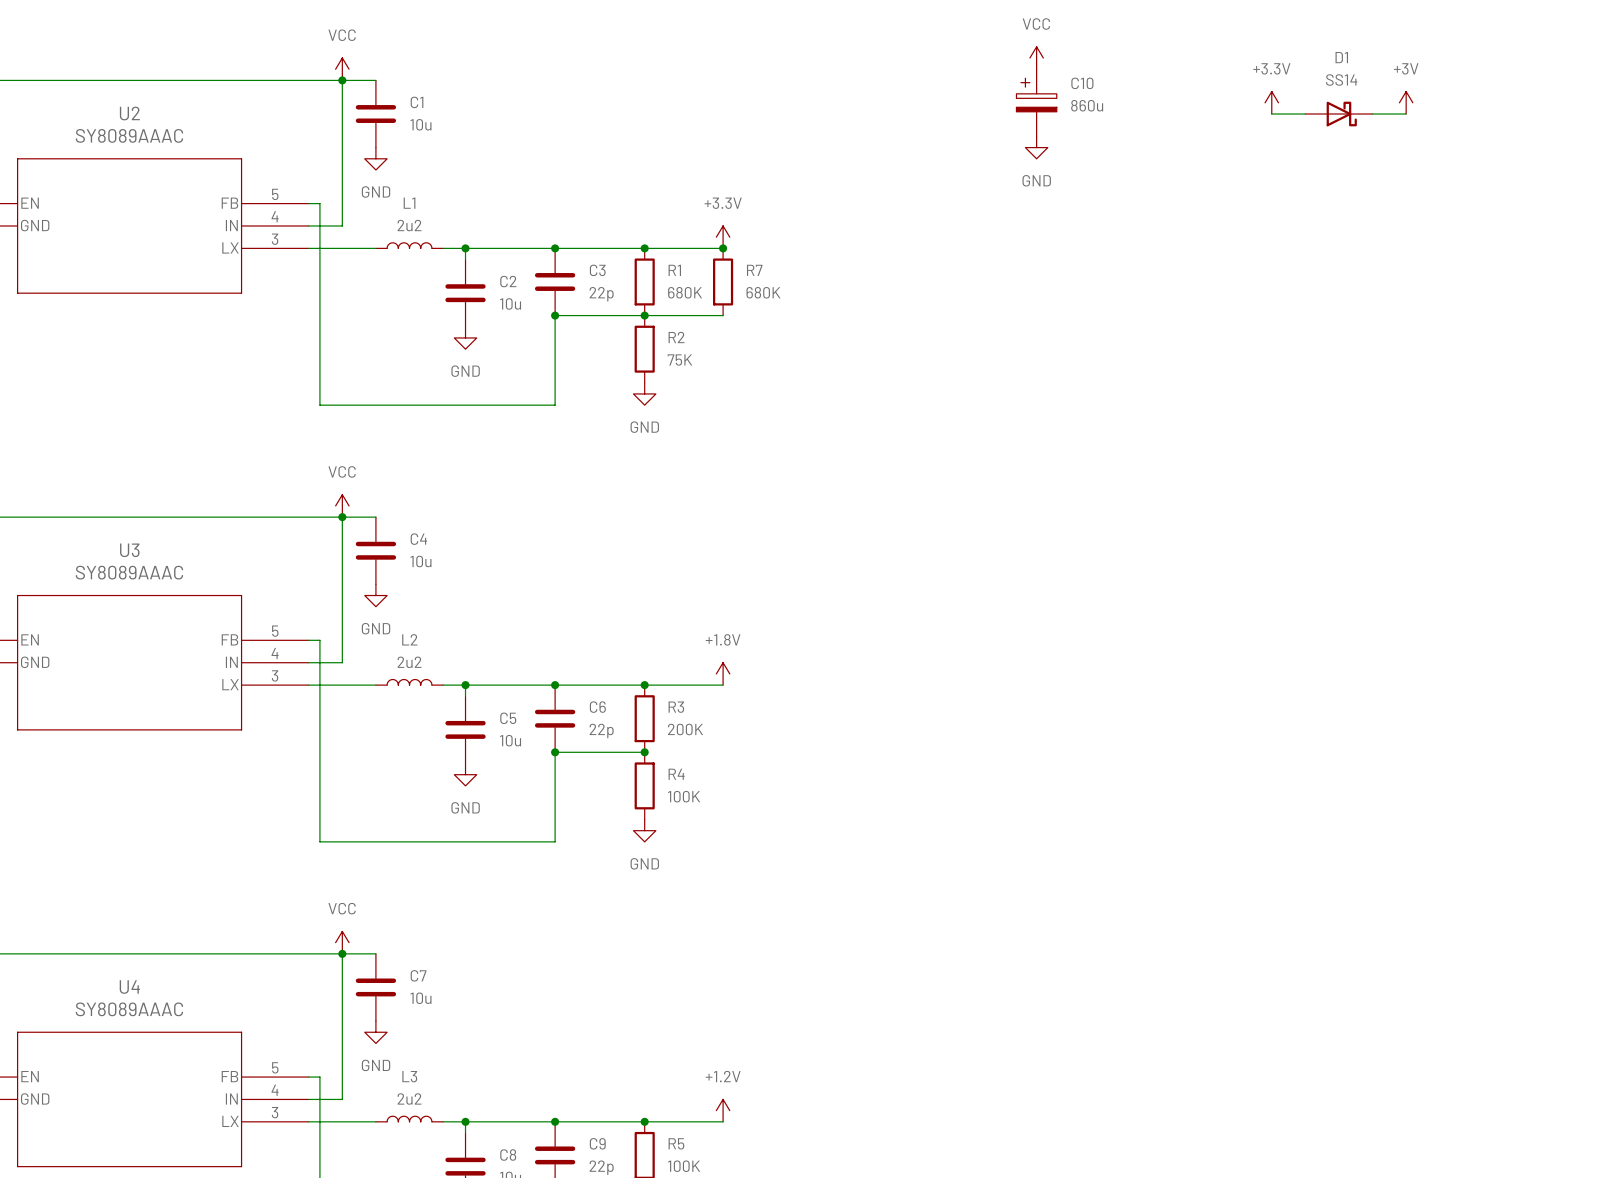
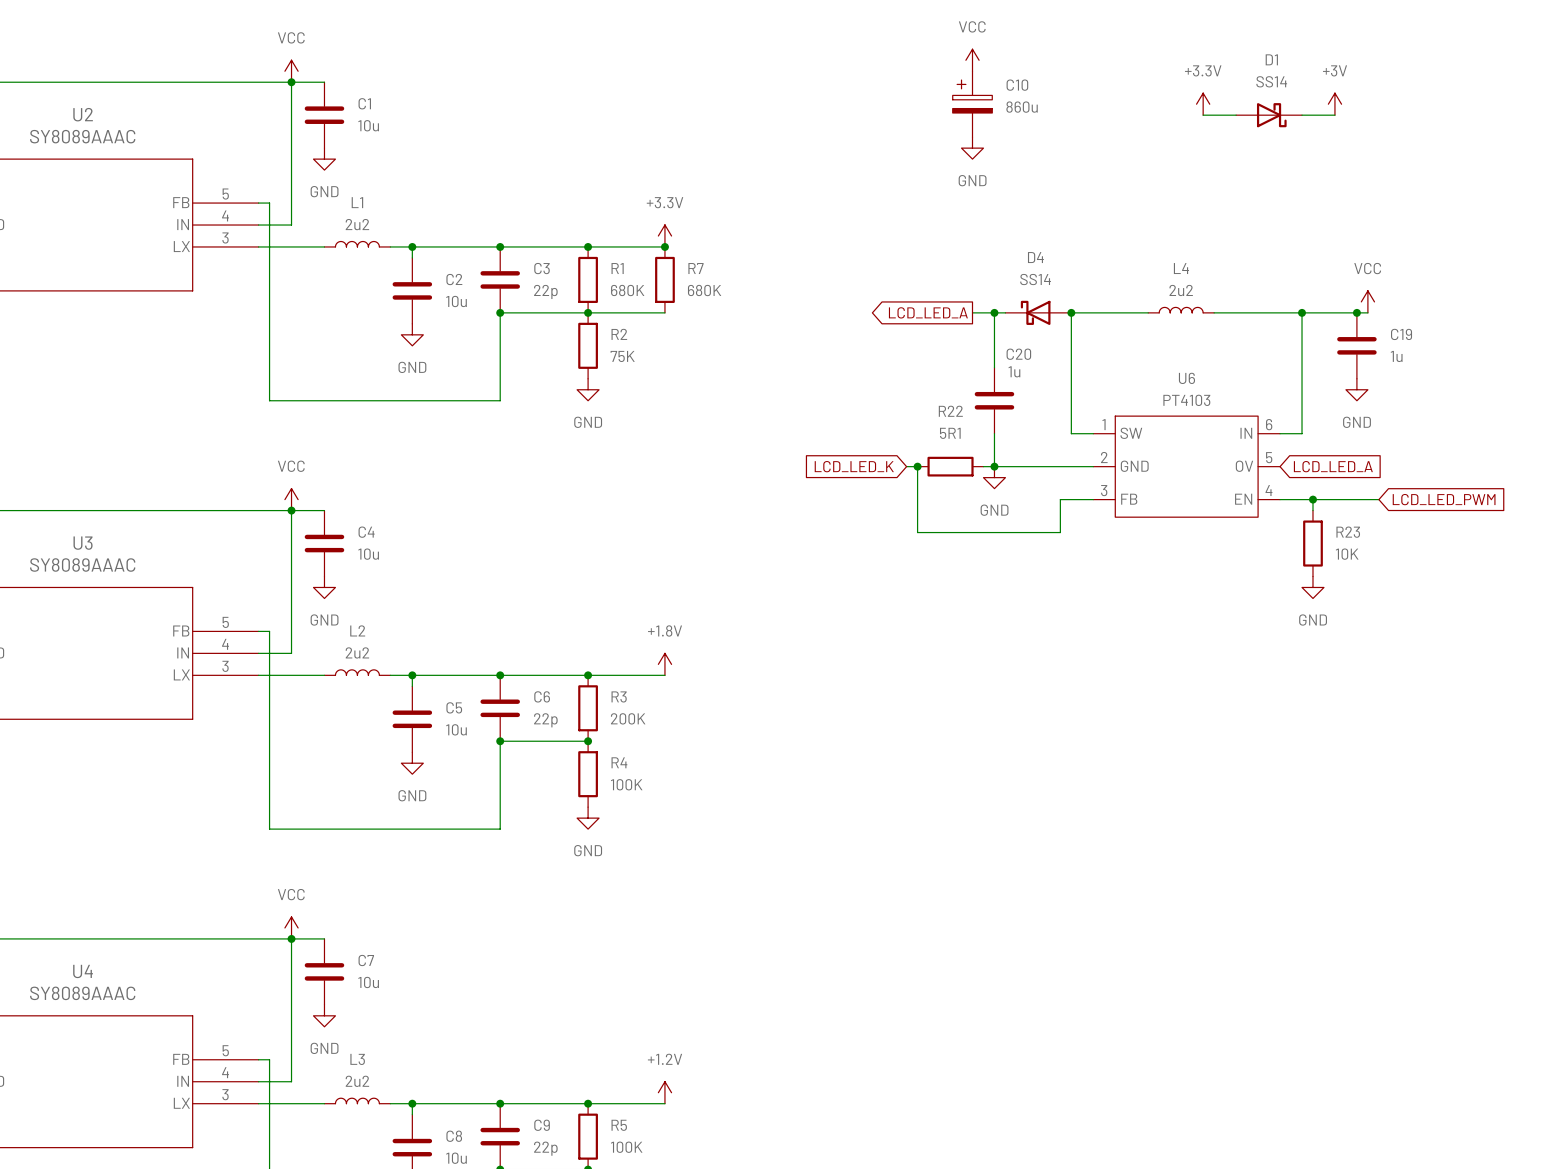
power symbol: none -> VCC (1367, 301)
L4: none -> 2u2 (1181, 310)
global label: none -> LCD_LED_A (928, 312)
wire: none -> (972, 312) (1005, 312)
wire: none -> (994, 312) (994, 367)
junction: none -> (994, 312)
D4: none -> SS14 (1038, 312)
junction: none -> (1071, 312)
wire: none -> (1148, 312) (1071, 312) (1071, 433) (1093, 433)
wire: none -> (1214, 312) (1367, 312)
wire: none -> (1302, 312) (1302, 433) (1280, 433)
junction: none -> (1302, 312)
junction: none -> (1356, 312)
C19: none -> 1u (1356, 345)
power symbol: none -> GND (1356, 389)
C20: none -> 1u (994, 400)
wire: none -> (994, 433) (994, 466)
global label: none -> LCD_LED_K (854, 466)
wire: none -> (906, 466) (917, 466) (917, 532) (1060, 532) (1060, 499) (1093, 499)
junction: none -> (917, 466)
R22: none -> 5R1 (950, 466)
wire: none -> (983, 466) (1093, 466)
junction: none -> (994, 466)
U6: none -> PT4103 (1186, 466)
global label: none -> LCD_LED_A (1333, 466)
power symbol: none -> GND (994, 477)
wire: none -> (1280, 499) (1378, 499)
wire: none -> (1312, 499) (1312, 510)
junction: none -> (1312, 499)
global label: none -> LCD_LED_PWM (1444, 499)
R23: none -> 10K (1312, 543)
power symbol: none -> GND (1312, 587)

